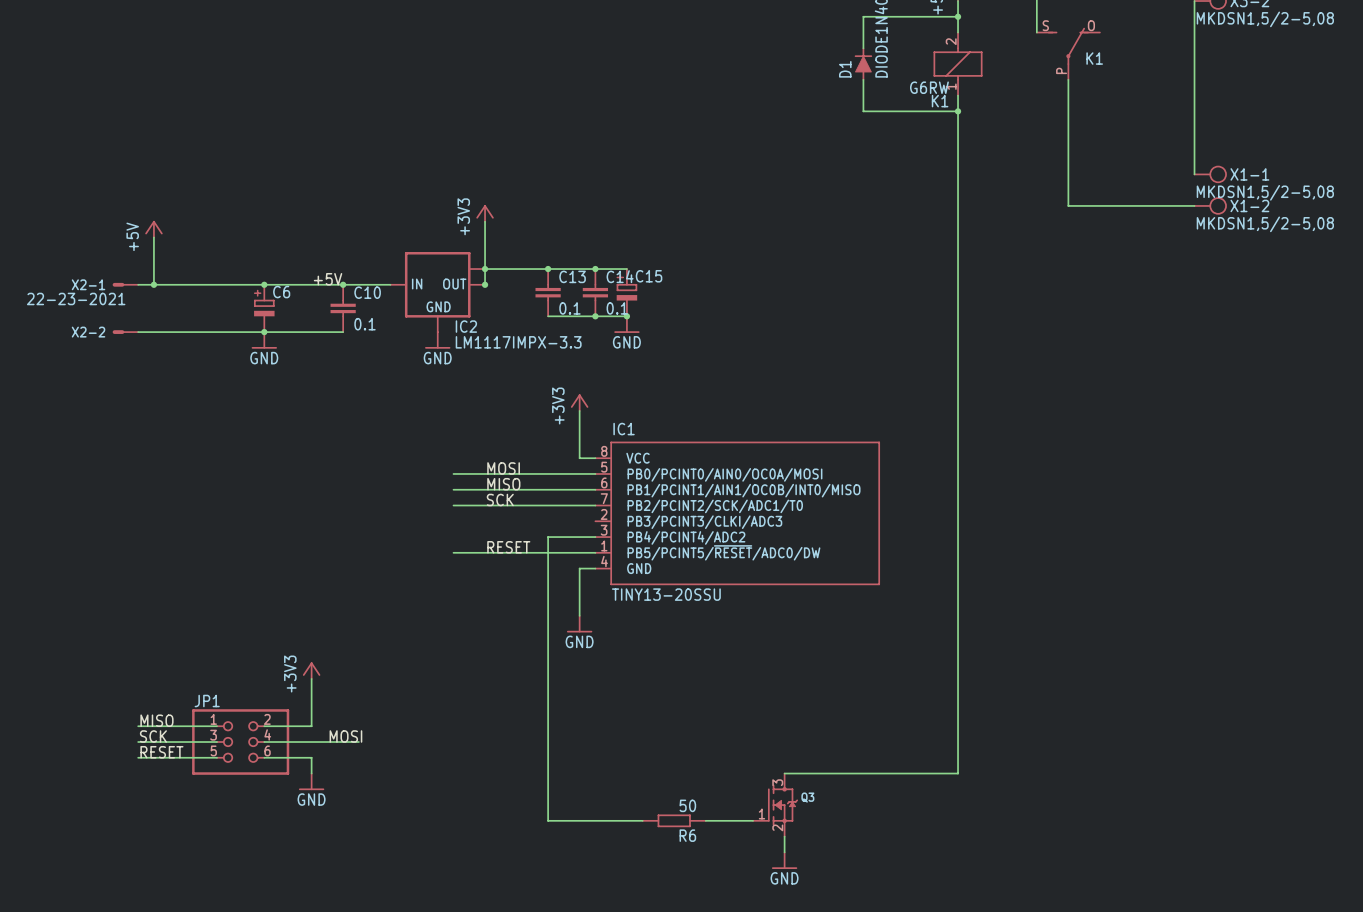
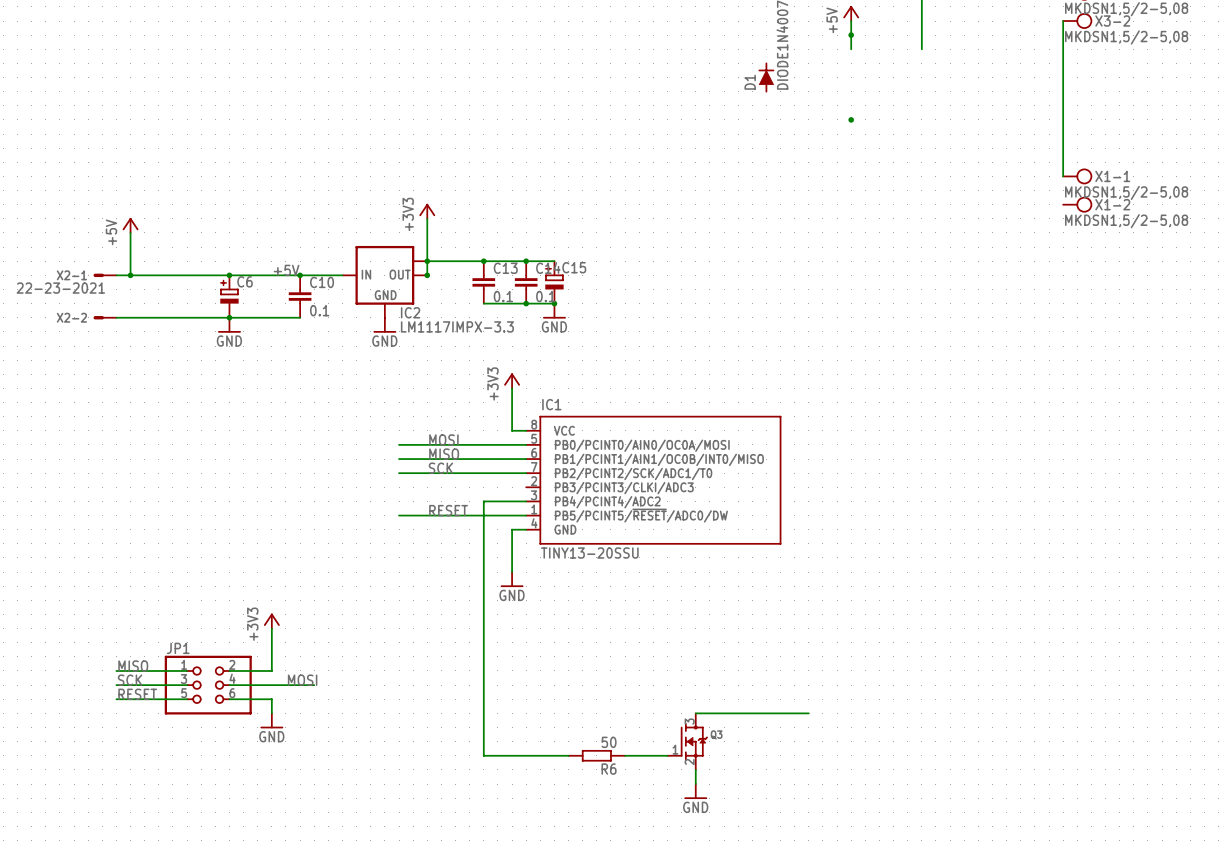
wire: (958, 16) (863, 16) (863, 48) -> none
K1: (1068, 53) -> none
K1: G6RW (958, 64) -> none
wire: (863, 79) (863, 111) (958, 111) -> none
wire: (1068, 79) (1068, 205) (1194, 205) -> none
wire: (958, 95) (958, 773) (910, 773) -> none

